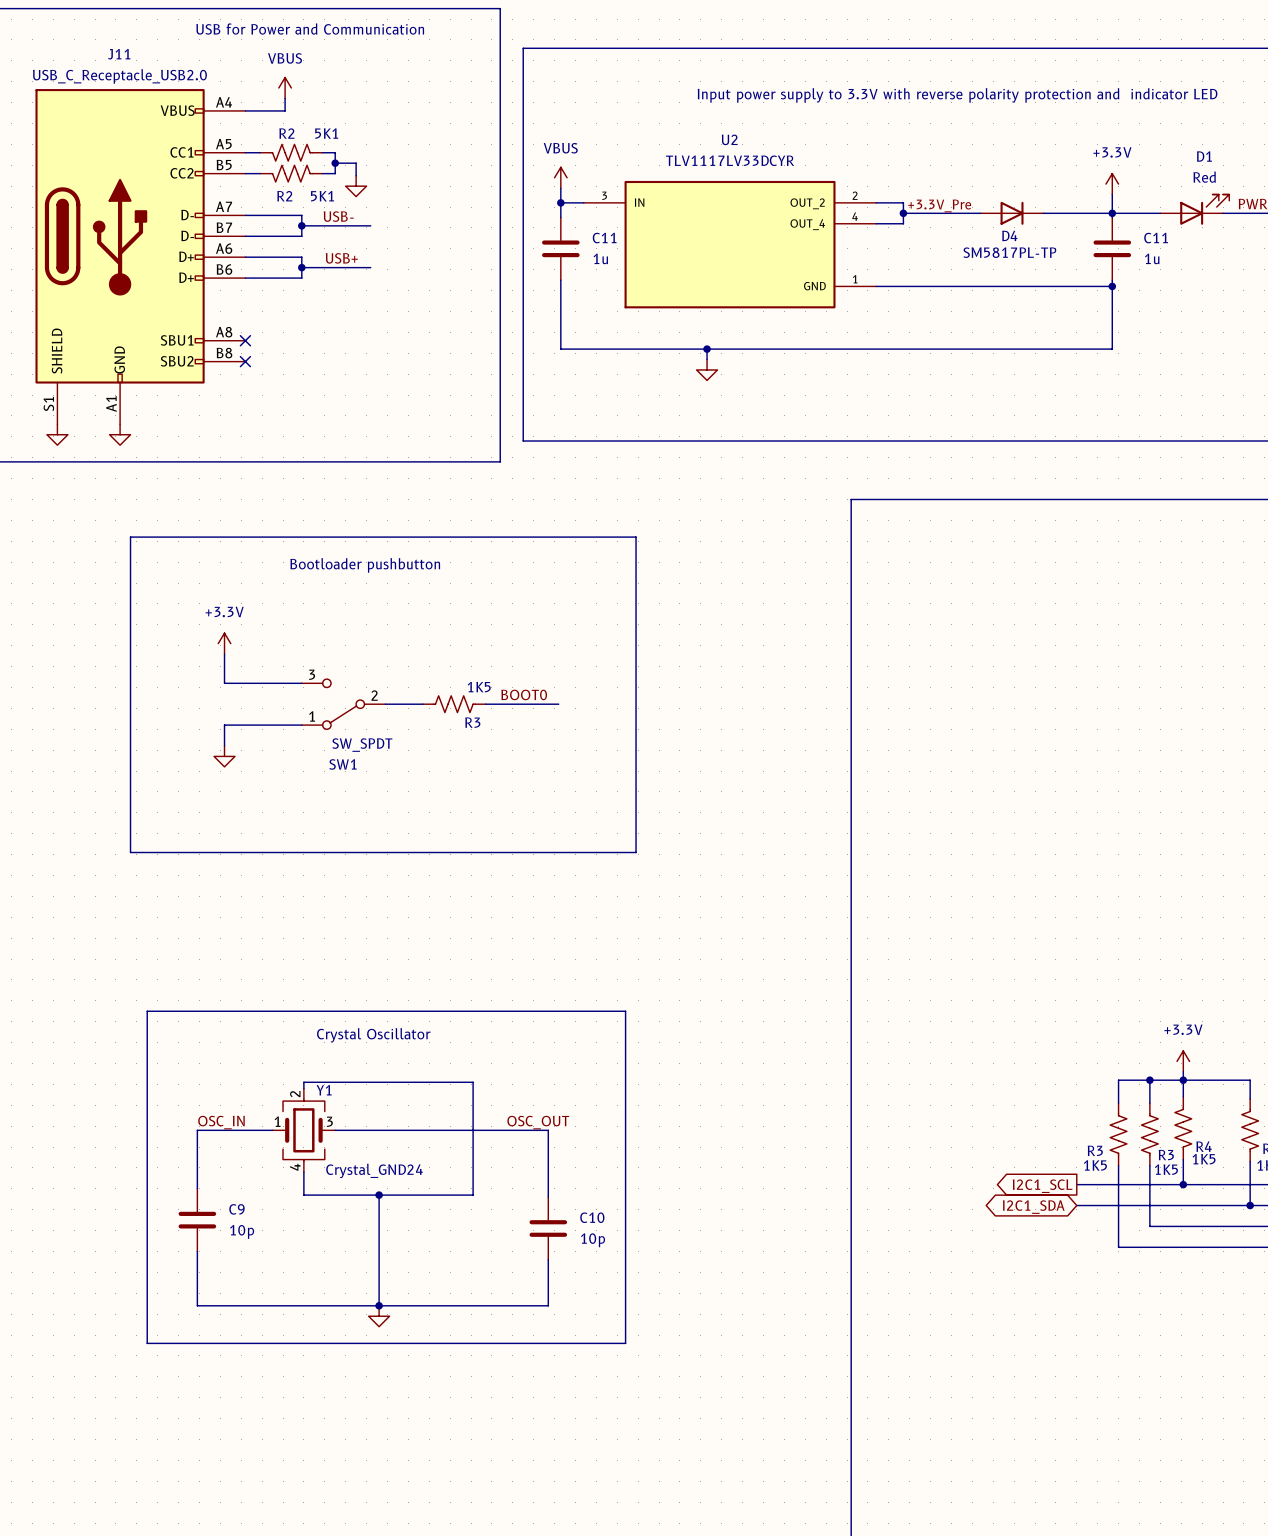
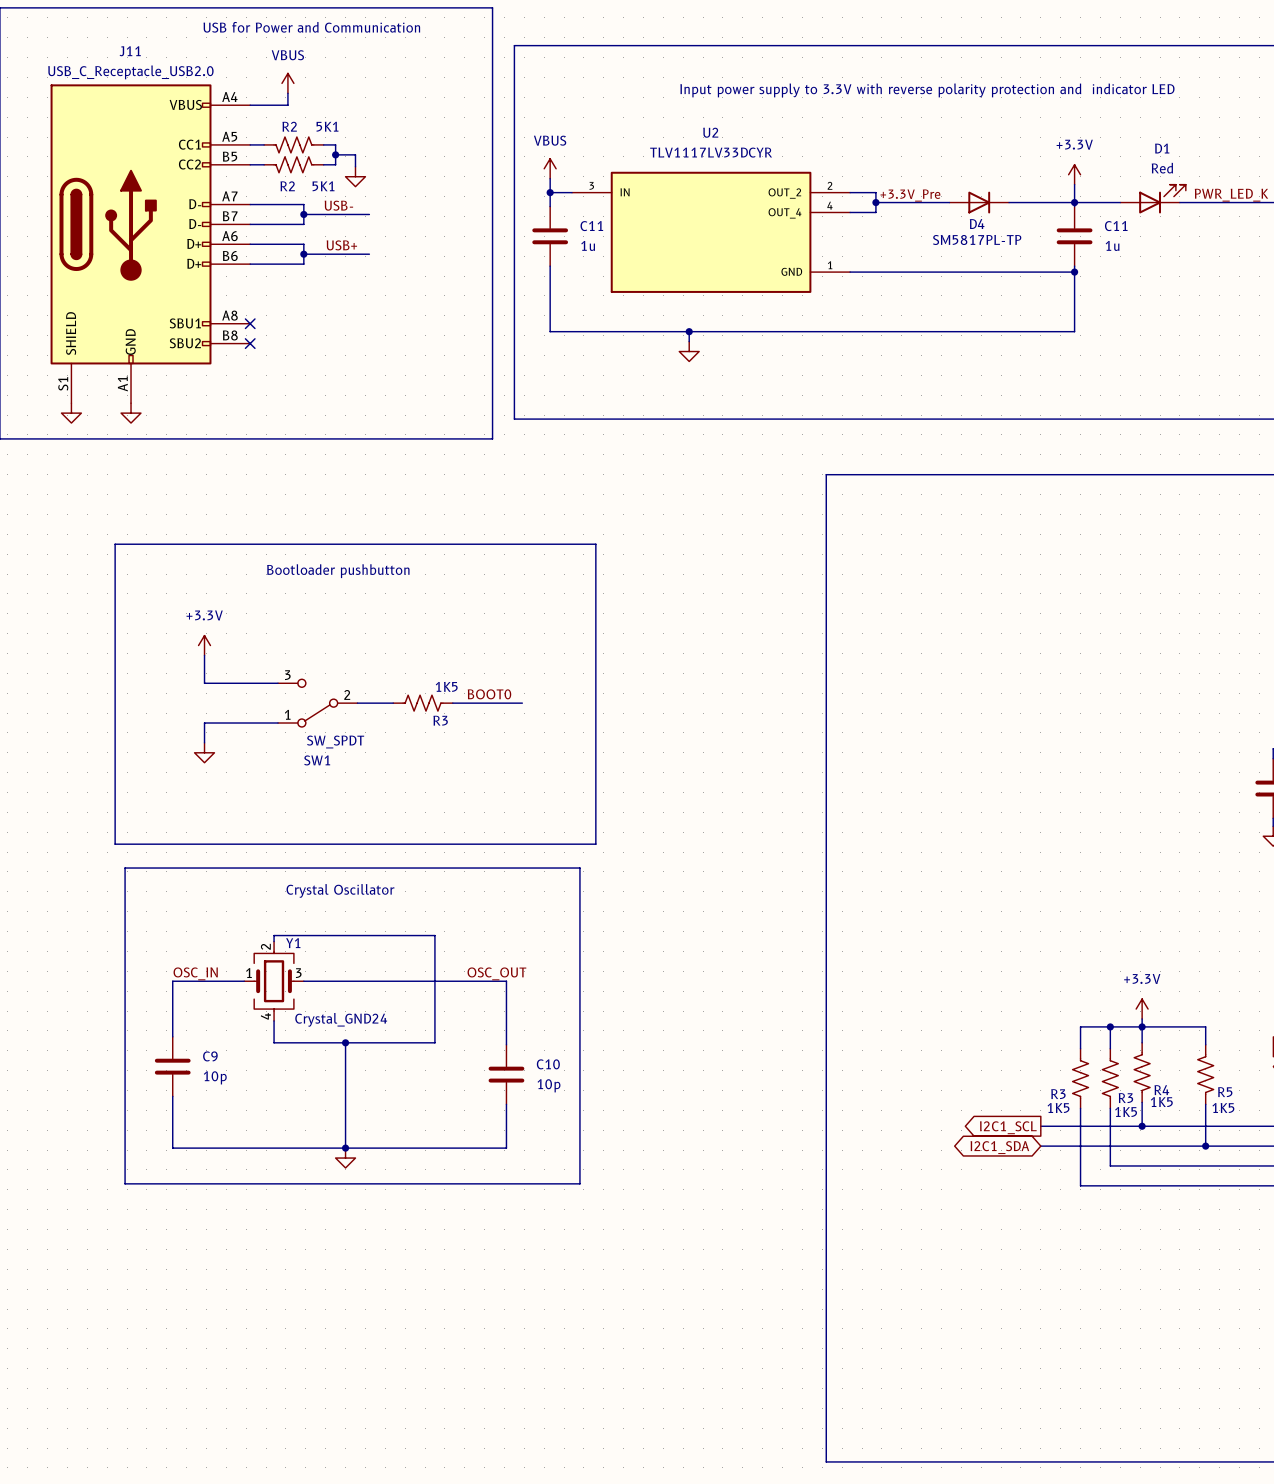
line: (130, 537) (636, 537) (636, 852) (130, 852) (130, 537) -> (115, 544) (595, 544) (595, 844) (115, 844) (115, 544)
text position: Bootloader pushbutton (365, 565) -> Bootloader pushbutton (338, 571)
power symbol position: +3.3V (224, 643) -> +3.3V (204, 645)
wire: (224, 654) (224, 683) (301, 683) -> (204, 655) (204, 683) (278, 683)
label position: BOOT0 (524, 694) -> BOOT0 (489, 694)
SW1 position: (343, 704) -> (317, 703)
wire: (385, 704) (422, 704) -> (357, 703) (393, 703)
R3 position: (454, 704) -> (423, 703)
wire: (485, 704) (558, 704) -> (452, 703) (522, 703)
wire: (301, 725) (224, 725) (224, 745) -> (278, 723) (204, 723) (204, 742)
power symbol position: (224, 756) -> (204, 752)
line: (147, 1011) (625, 1011) (625, 1343) (147, 1343) (147, 1011) -> (125, 868) (579, 868) (579, 1183) (125, 1183) (125, 868)
text position: Crystal Oscillator (373, 1035) -> Crystal Oscillator (340, 890)
wire: (303, 1088) (303, 1082) (473, 1082) (473, 1195) (303, 1195) (303, 1172) -> (274, 941) (274, 935) (434, 935) (434, 1042) (274, 1042) (274, 1020)
junction: none -> (345, 1042)
label position: OSC_IN (221, 1122) -> OSC_IN (195, 973)
label position: OSC_OUT (538, 1122) -> OSC_OUT (496, 973)
wire: (272, 1130) (197, 1130) (197, 1188) -> (244, 981) (172, 981) (172, 1036)
Y1 position: (303, 1130) -> (274, 981)
wire: (335, 1130) (548, 1130) (548, 1197) -> (303, 981) (506, 981) (506, 1044)
wire: (379, 1195) (379, 1305) -> (345, 1042) (345, 1148)
junction position: (379, 1195) -> (345, 1148)
C9 position: (197, 1220) -> (172, 1066)
C10 position: (548, 1228) -> (506, 1074)
wire: (197, 1251) (197, 1305) (548, 1305) (548, 1259) -> (172, 1096) (172, 1148) (506, 1148) (506, 1104)
junction: (379, 1305) -> none
power symbol position: (379, 1316) -> (345, 1158)

